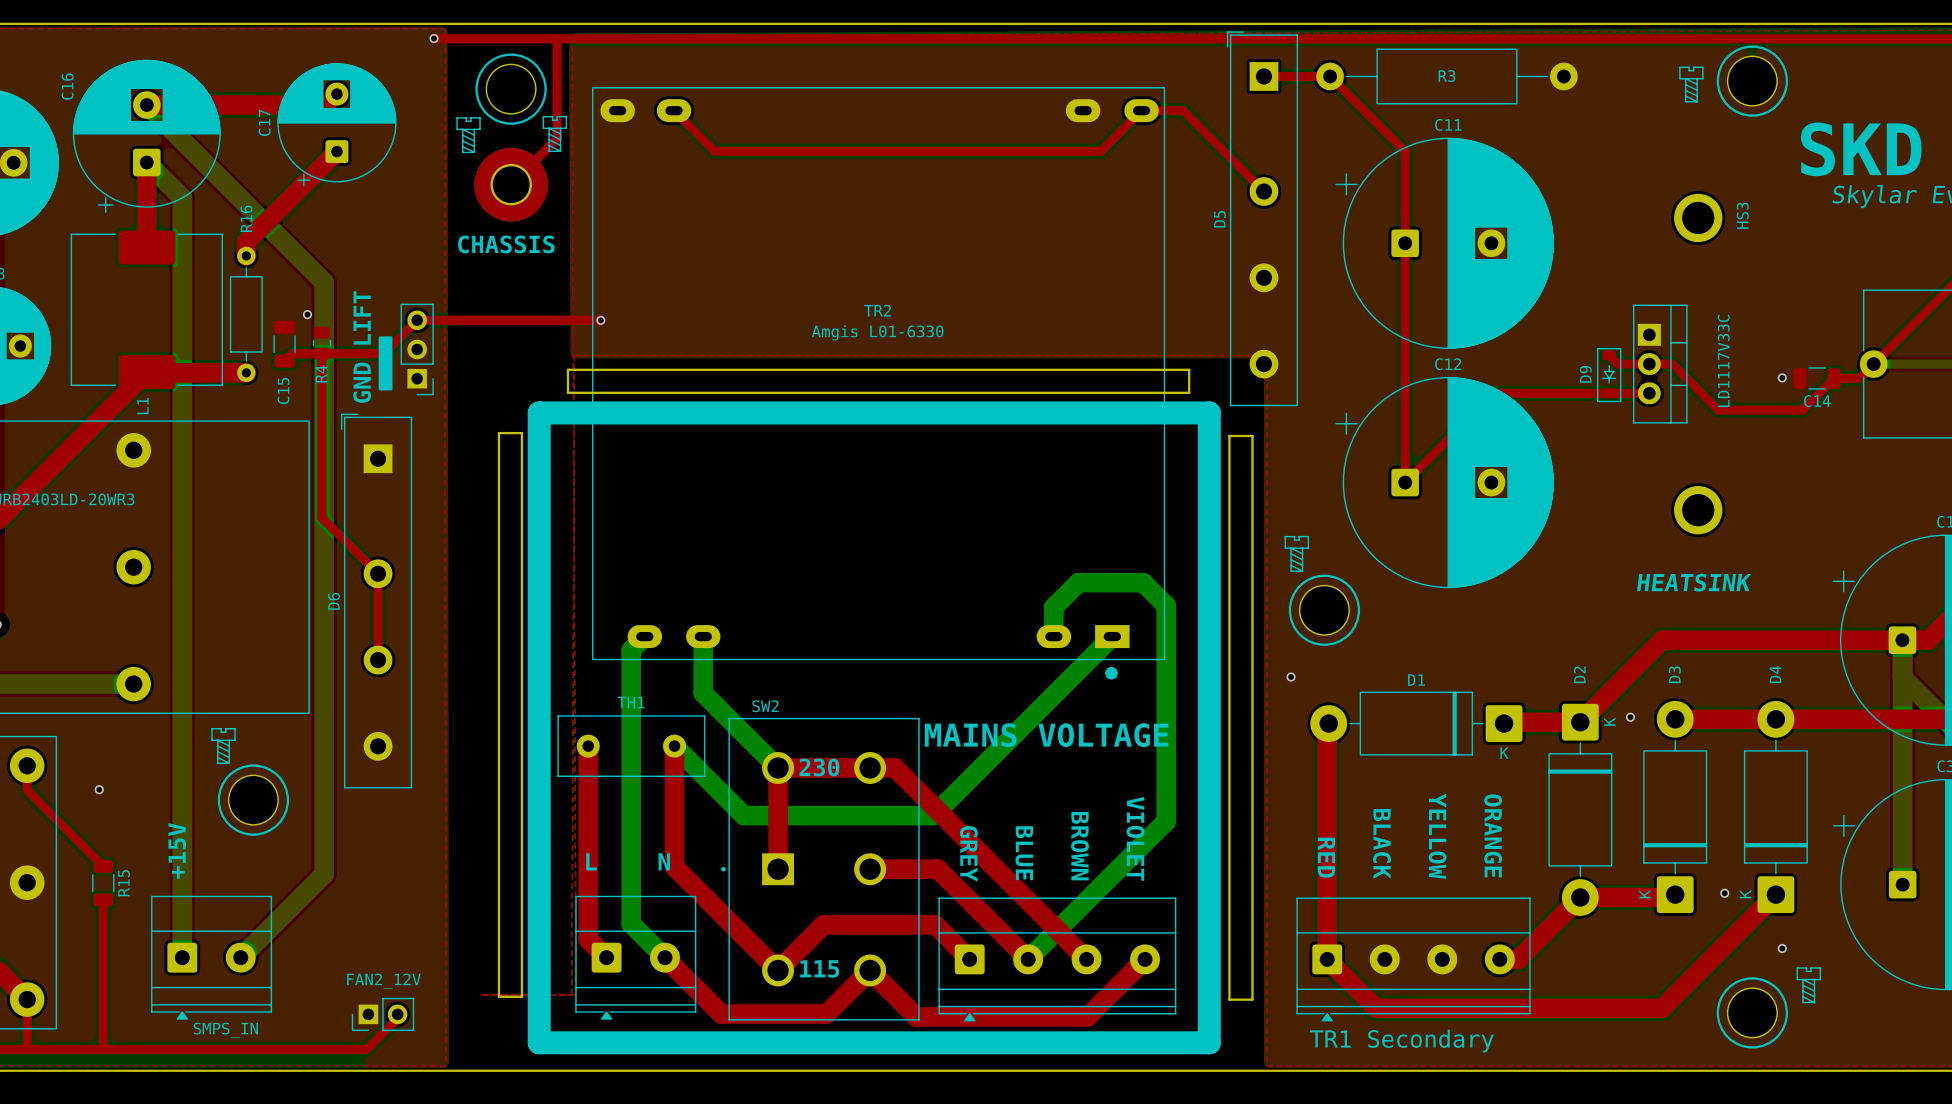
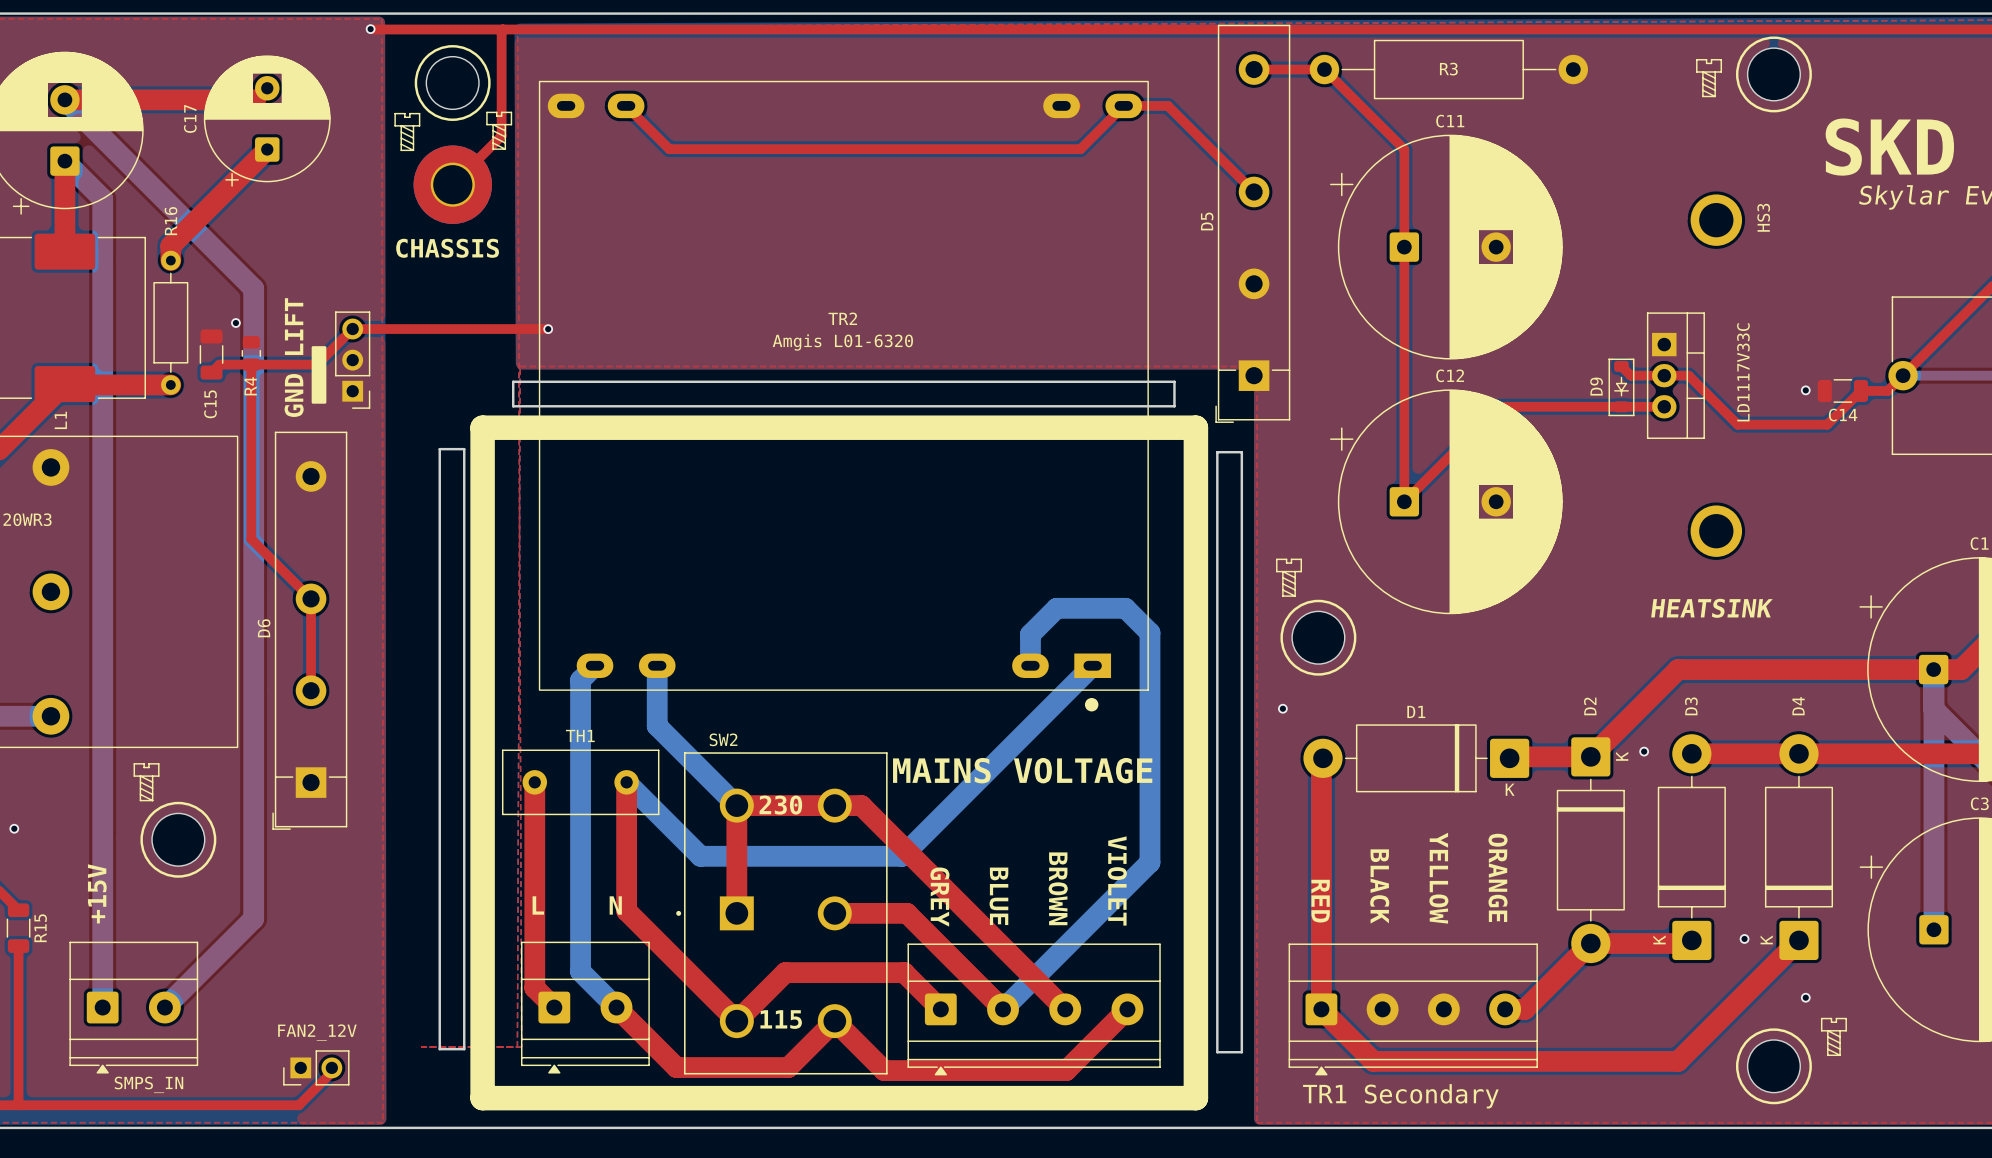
D5 footprint: [1226, 31, 1299, 407] -> [1215, 24, 1291, 423]
TR2 value: Amgis L01-6330 (877, 332) -> Amgis L01-6320 (842, 342)
D6 footprint: [341, 413, 413, 789] -> [272, 431, 348, 830]

